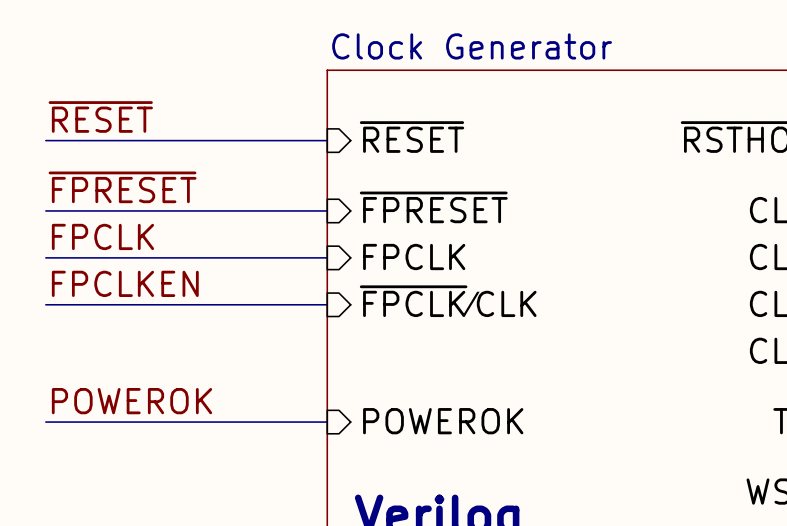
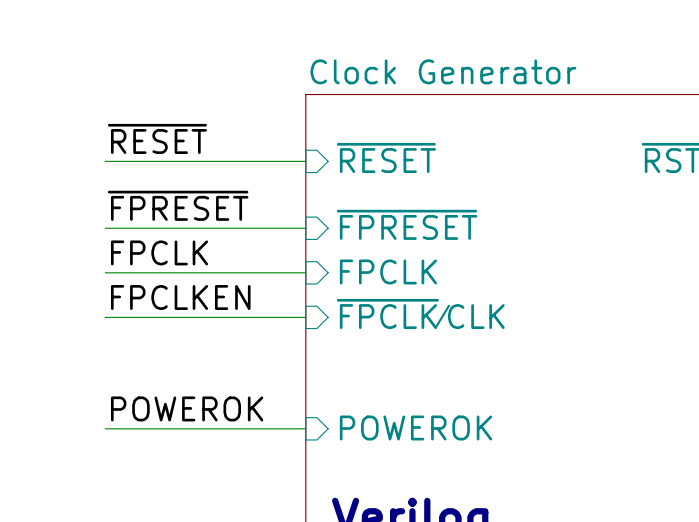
label position: ~{RESET} (100, 116) -> ~{RESET} (157, 138)
wire: (45, 140) (116, 140) -> none
label position: ~{FPRESET} (122, 187) -> ~{FPRESET} (178, 205)
wire: (45, 210) (116, 210) -> none
label position: FPCLK (102, 236) -> FPCLK (159, 252)
wire: (45, 257) (116, 257) -> none
label position: FPCLKEN (125, 283) -> FPCLKEN (180, 297)
wire: (45, 304) (116, 304) -> none
label position: POWEROK (132, 401) -> POWEROK (187, 408)
wire: (45, 422) (116, 422) -> none

